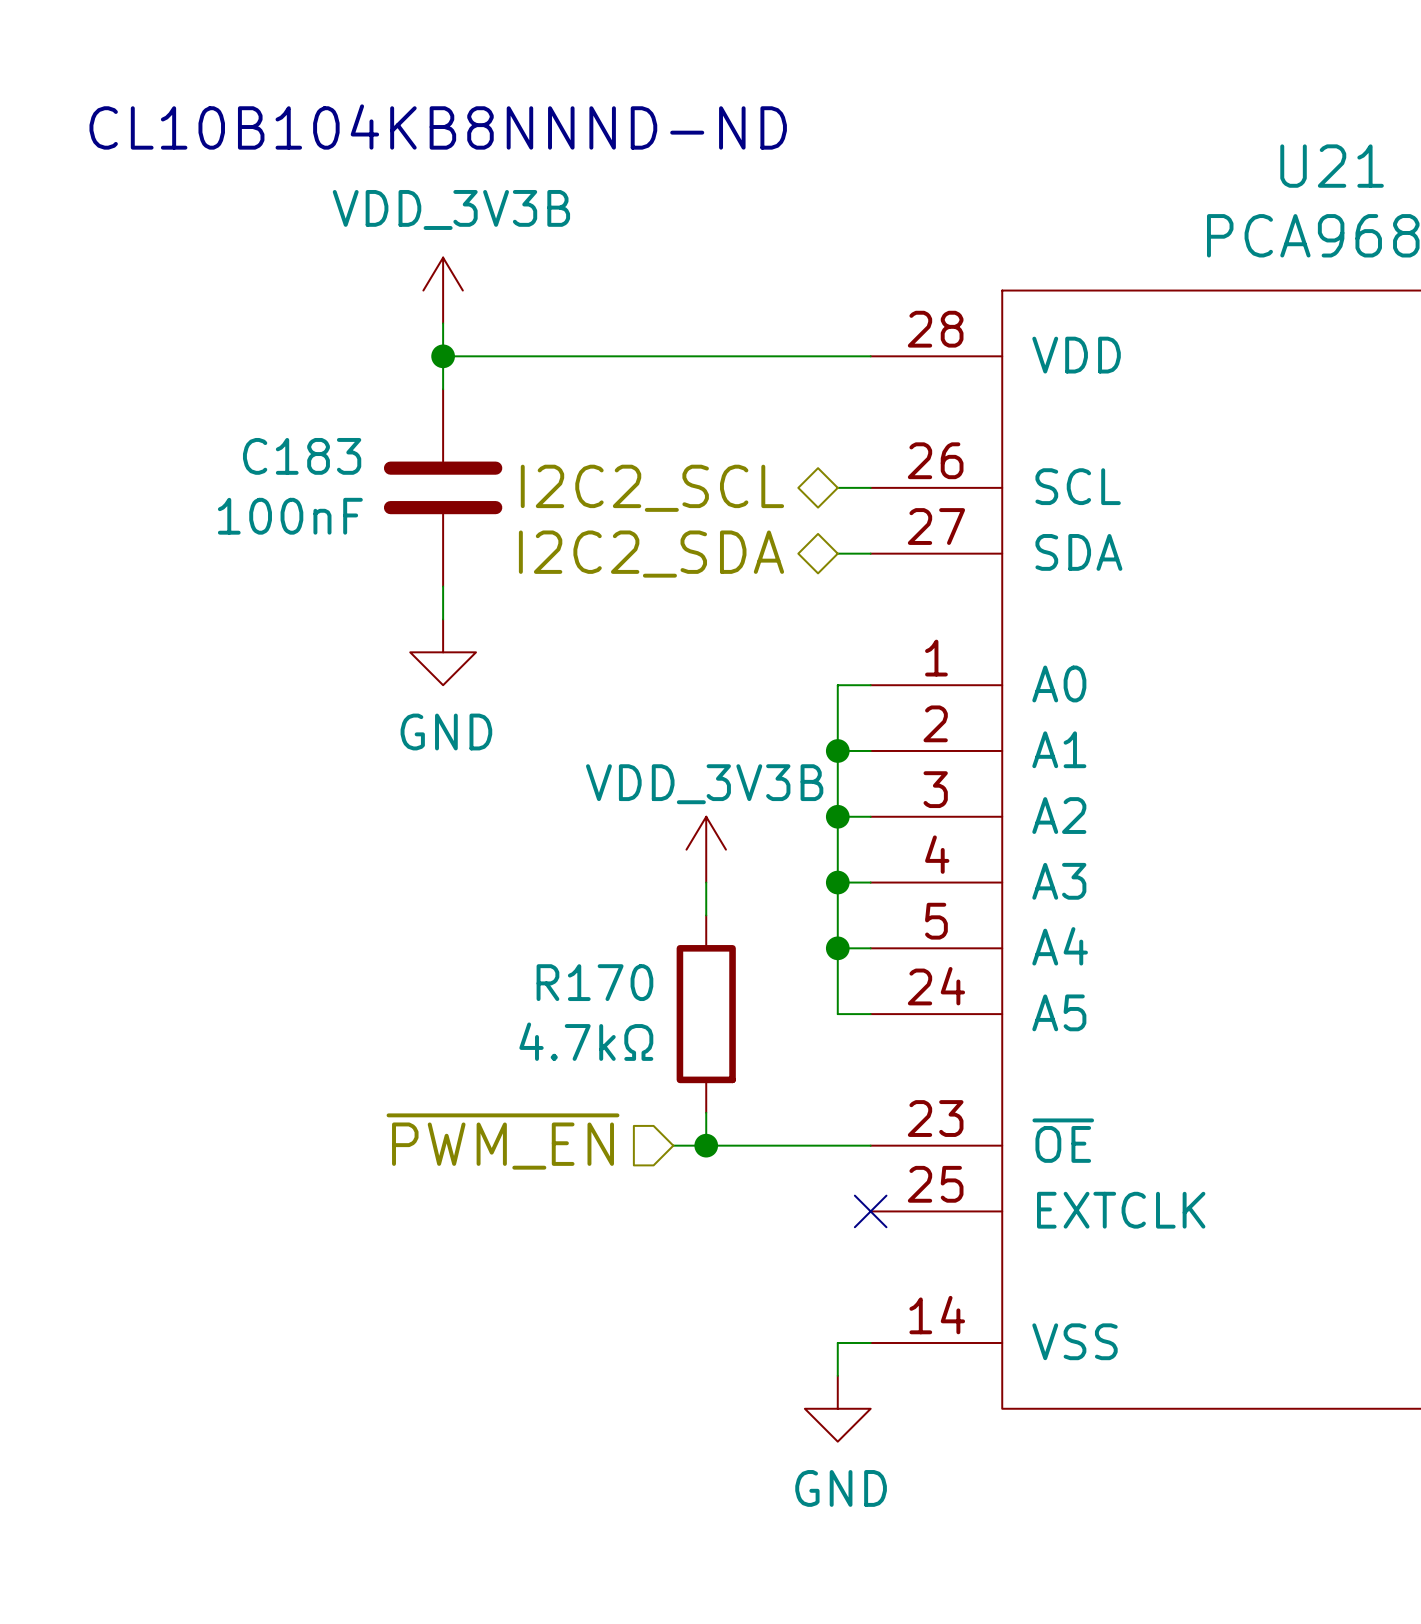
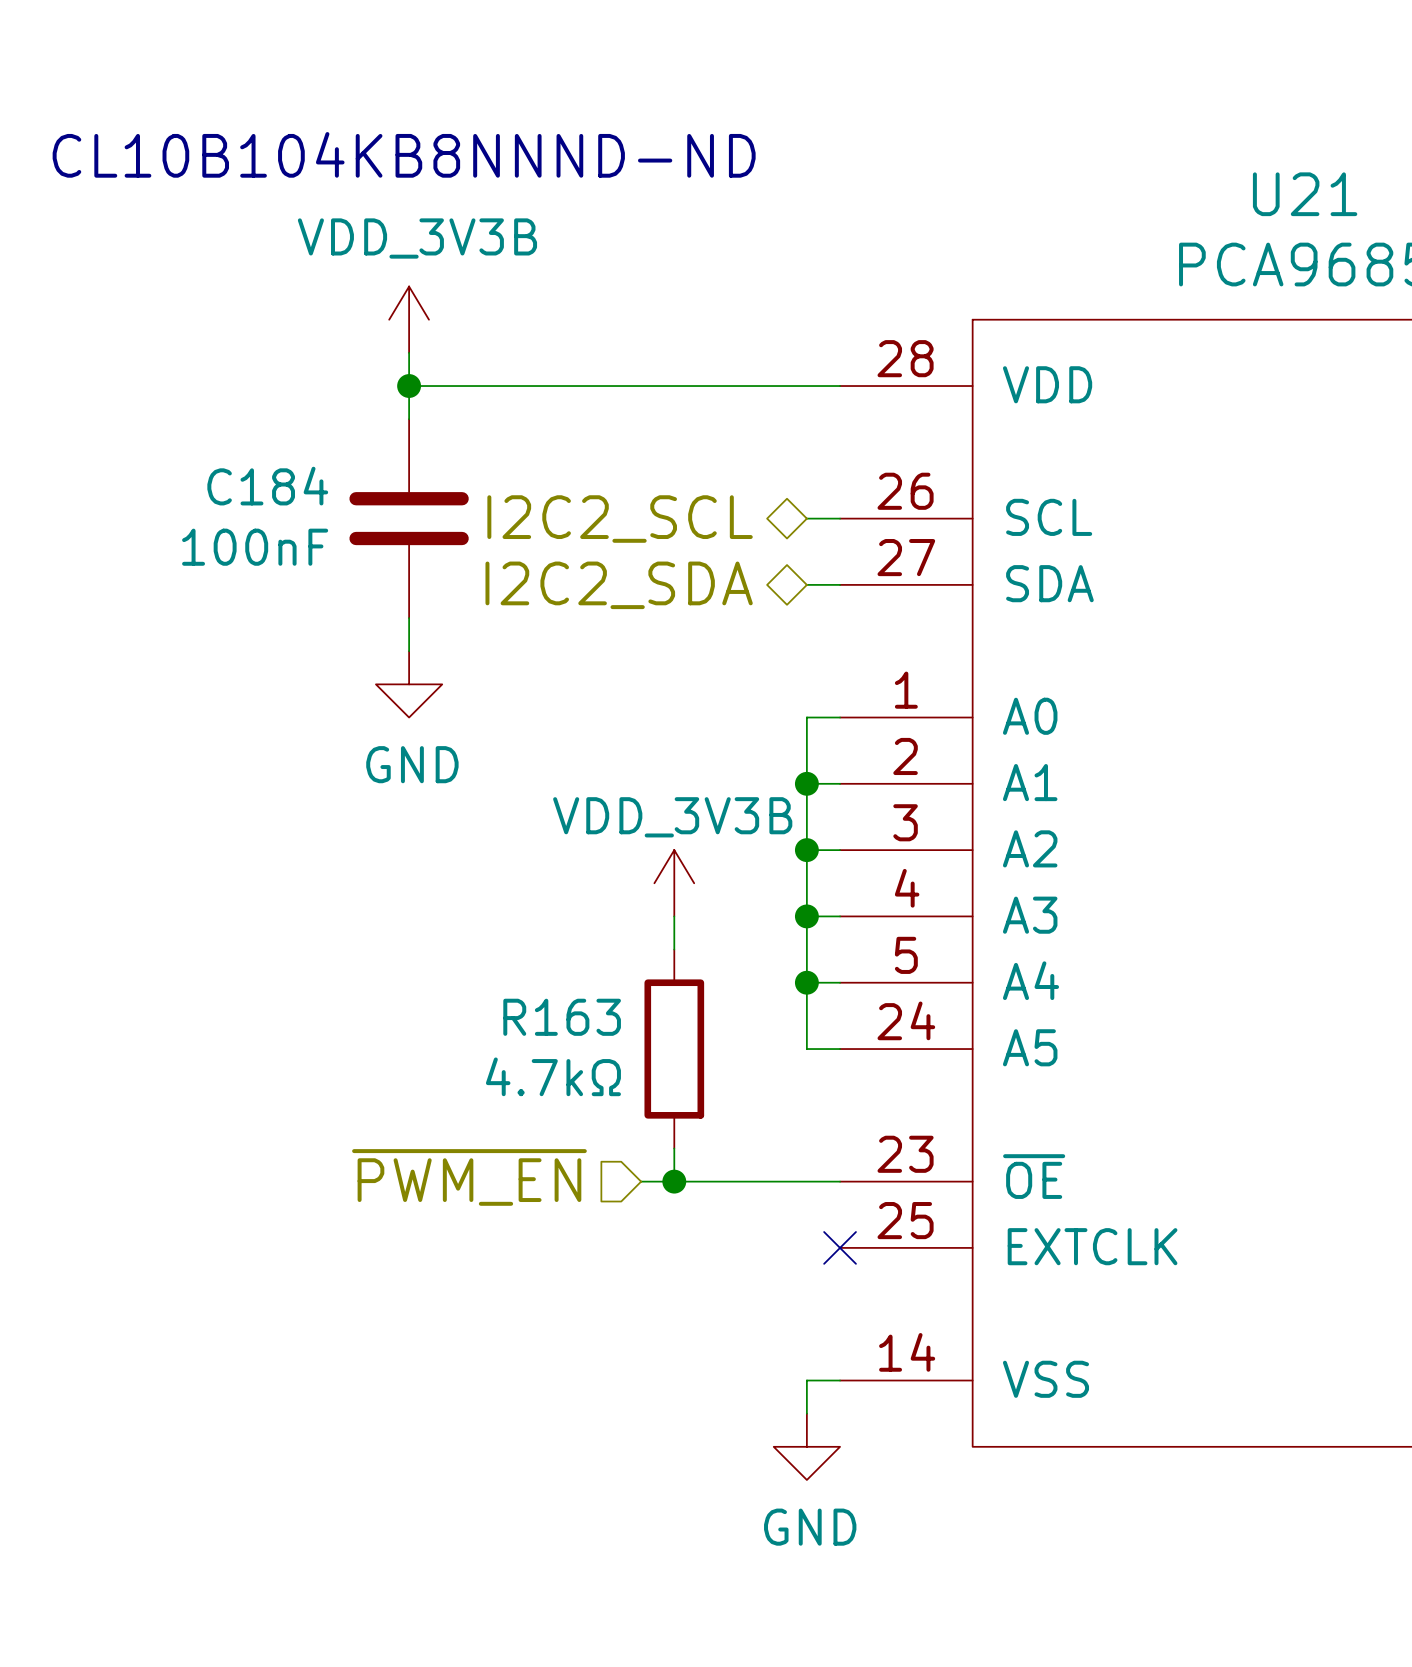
C183 name: C183 (302, 456) -> C184 (267, 486)
R170 name: R170 (594, 982) -> R163 (562, 1017)

